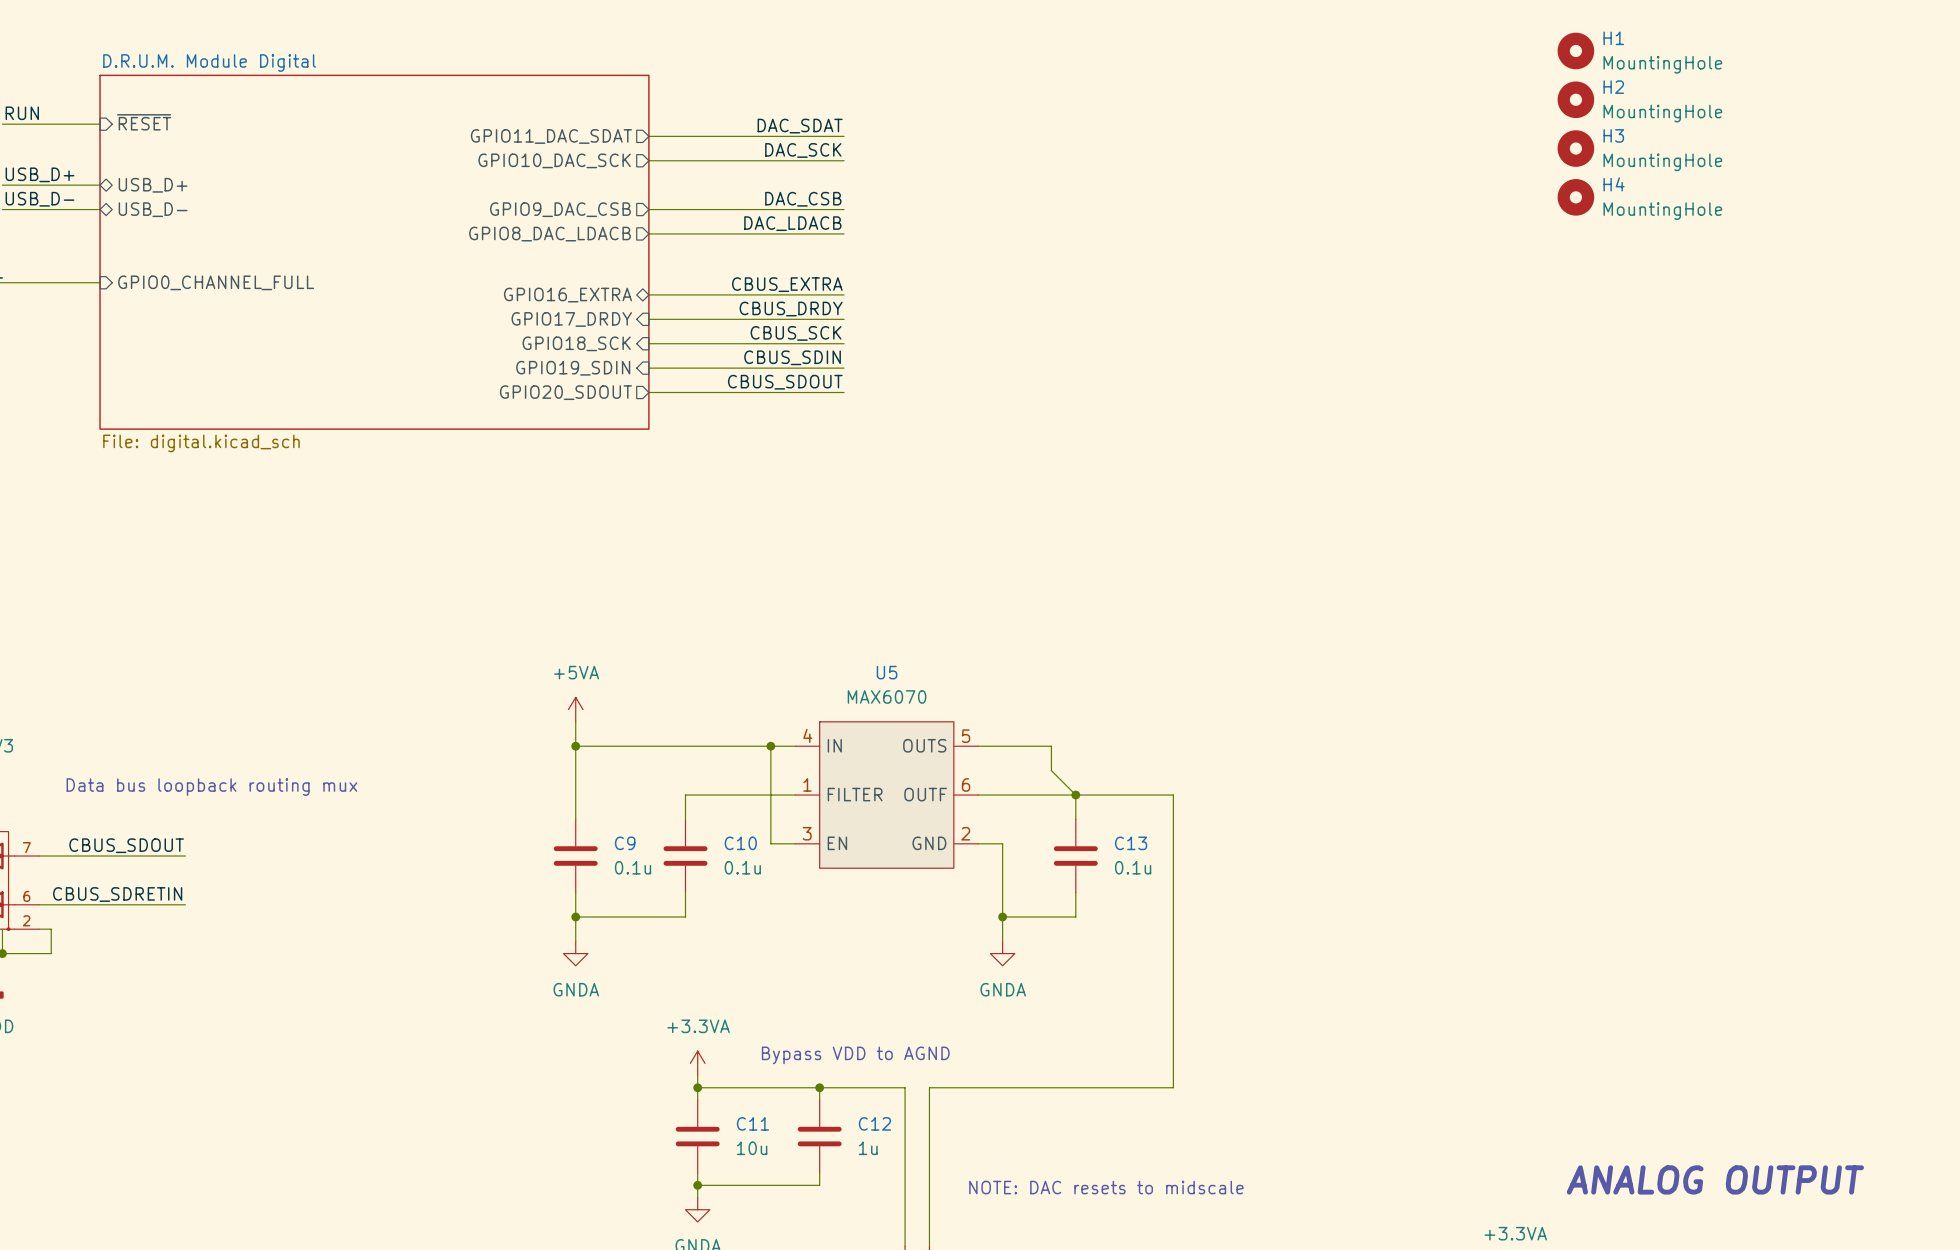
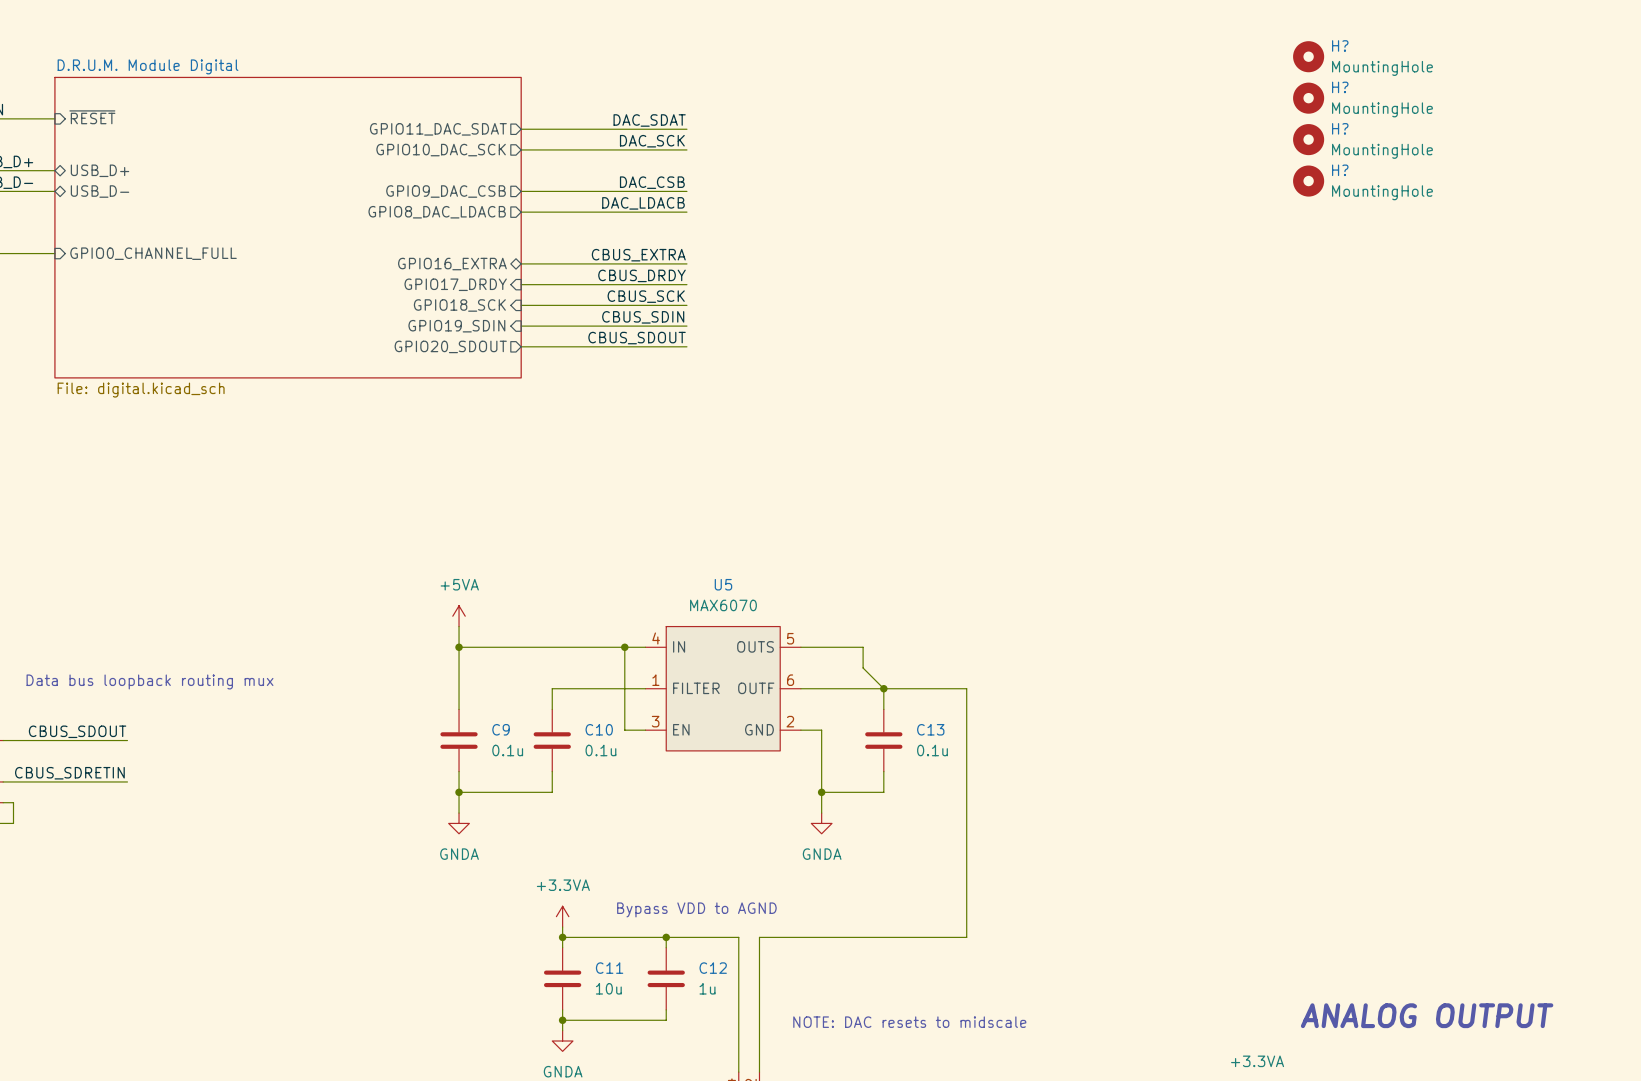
H1 name: H1 (1613, 38) -> H? (1340, 45)
H2 name: H2 (1613, 87) -> H? (1340, 87)
H3 name: H3 (1613, 135) -> H? (1340, 128)
H4 name: H4 (1614, 184) -> H? (1340, 170)

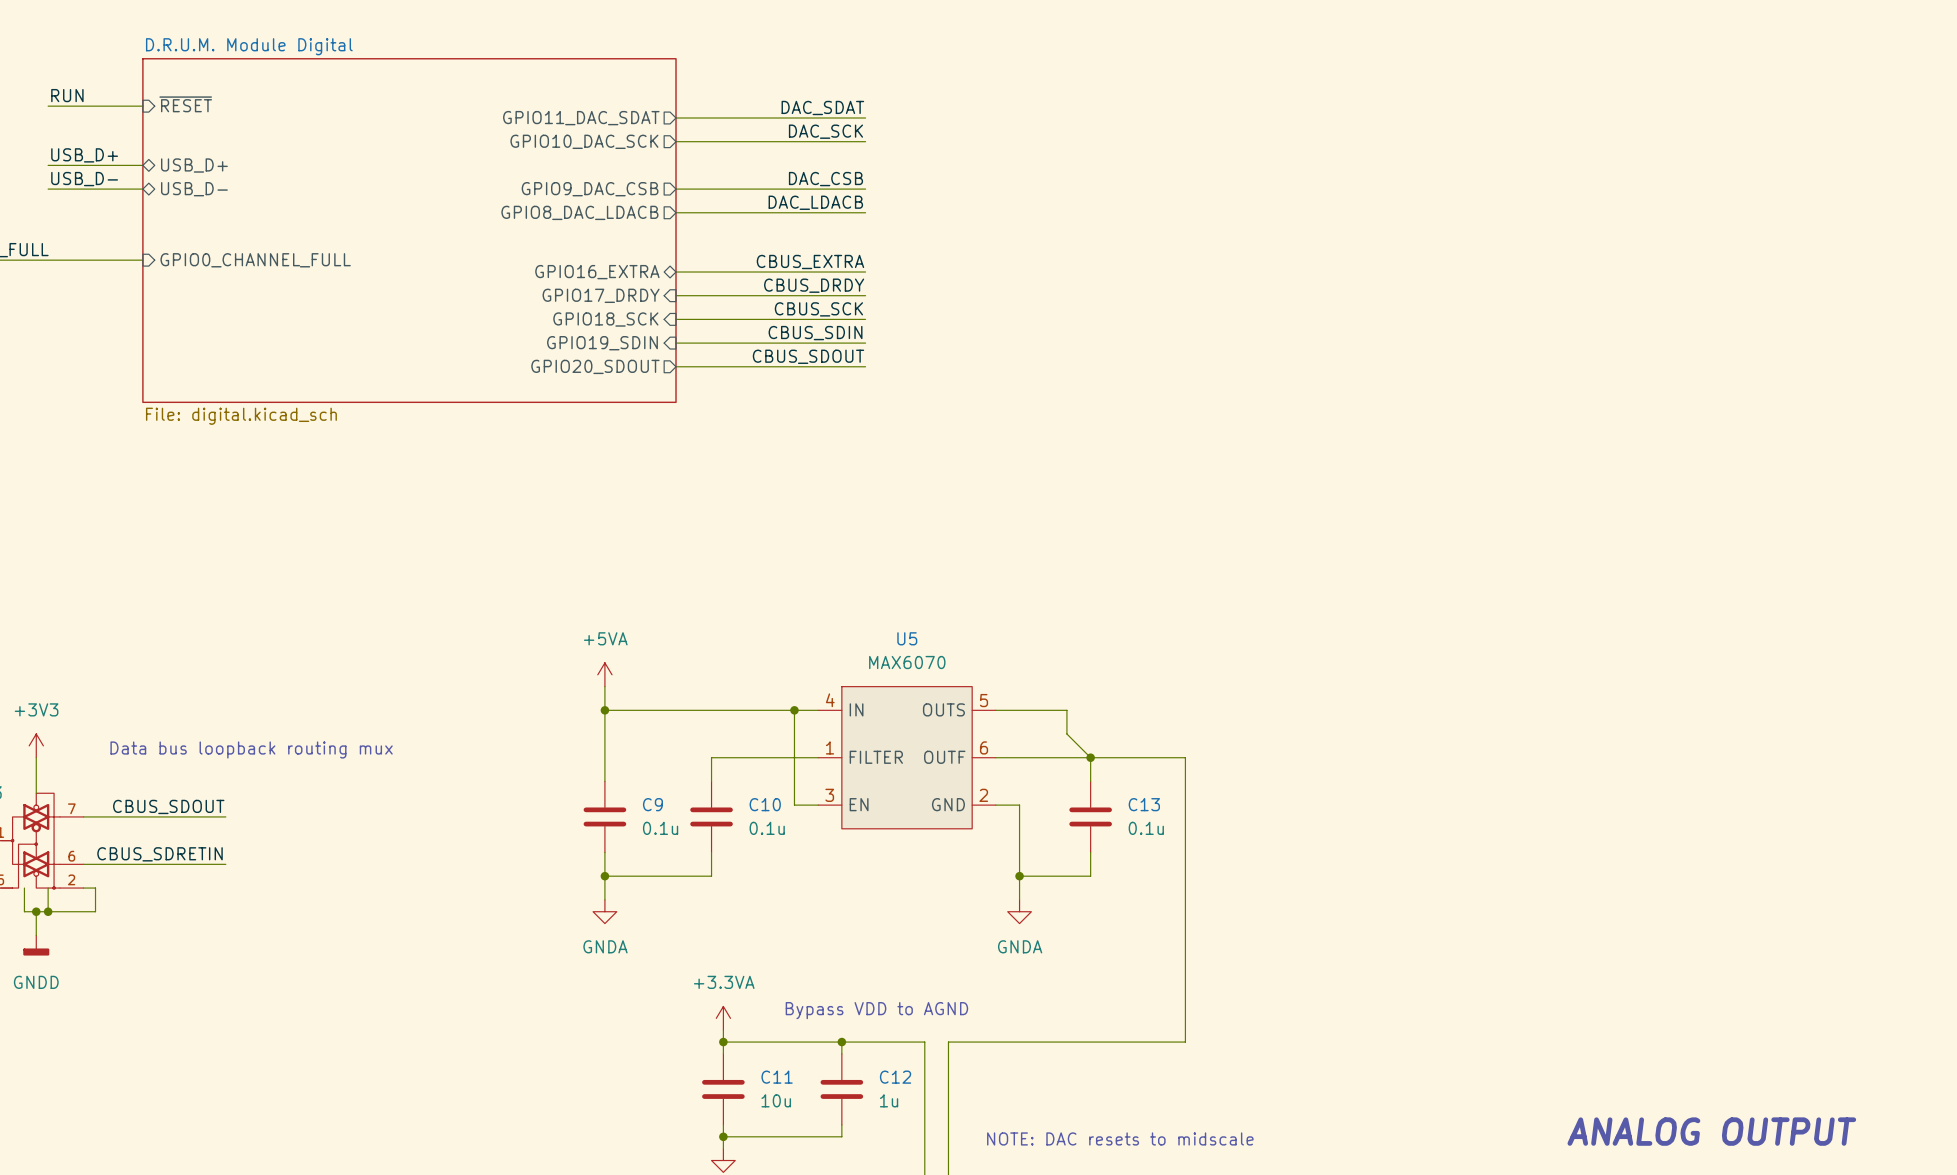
H?: MountingHole (1308, 56) -> none
H?: MountingHole (1308, 98) -> none
H?: MountingHole (1308, 139) -> none
H?: MountingHole (1308, 181) -> none

